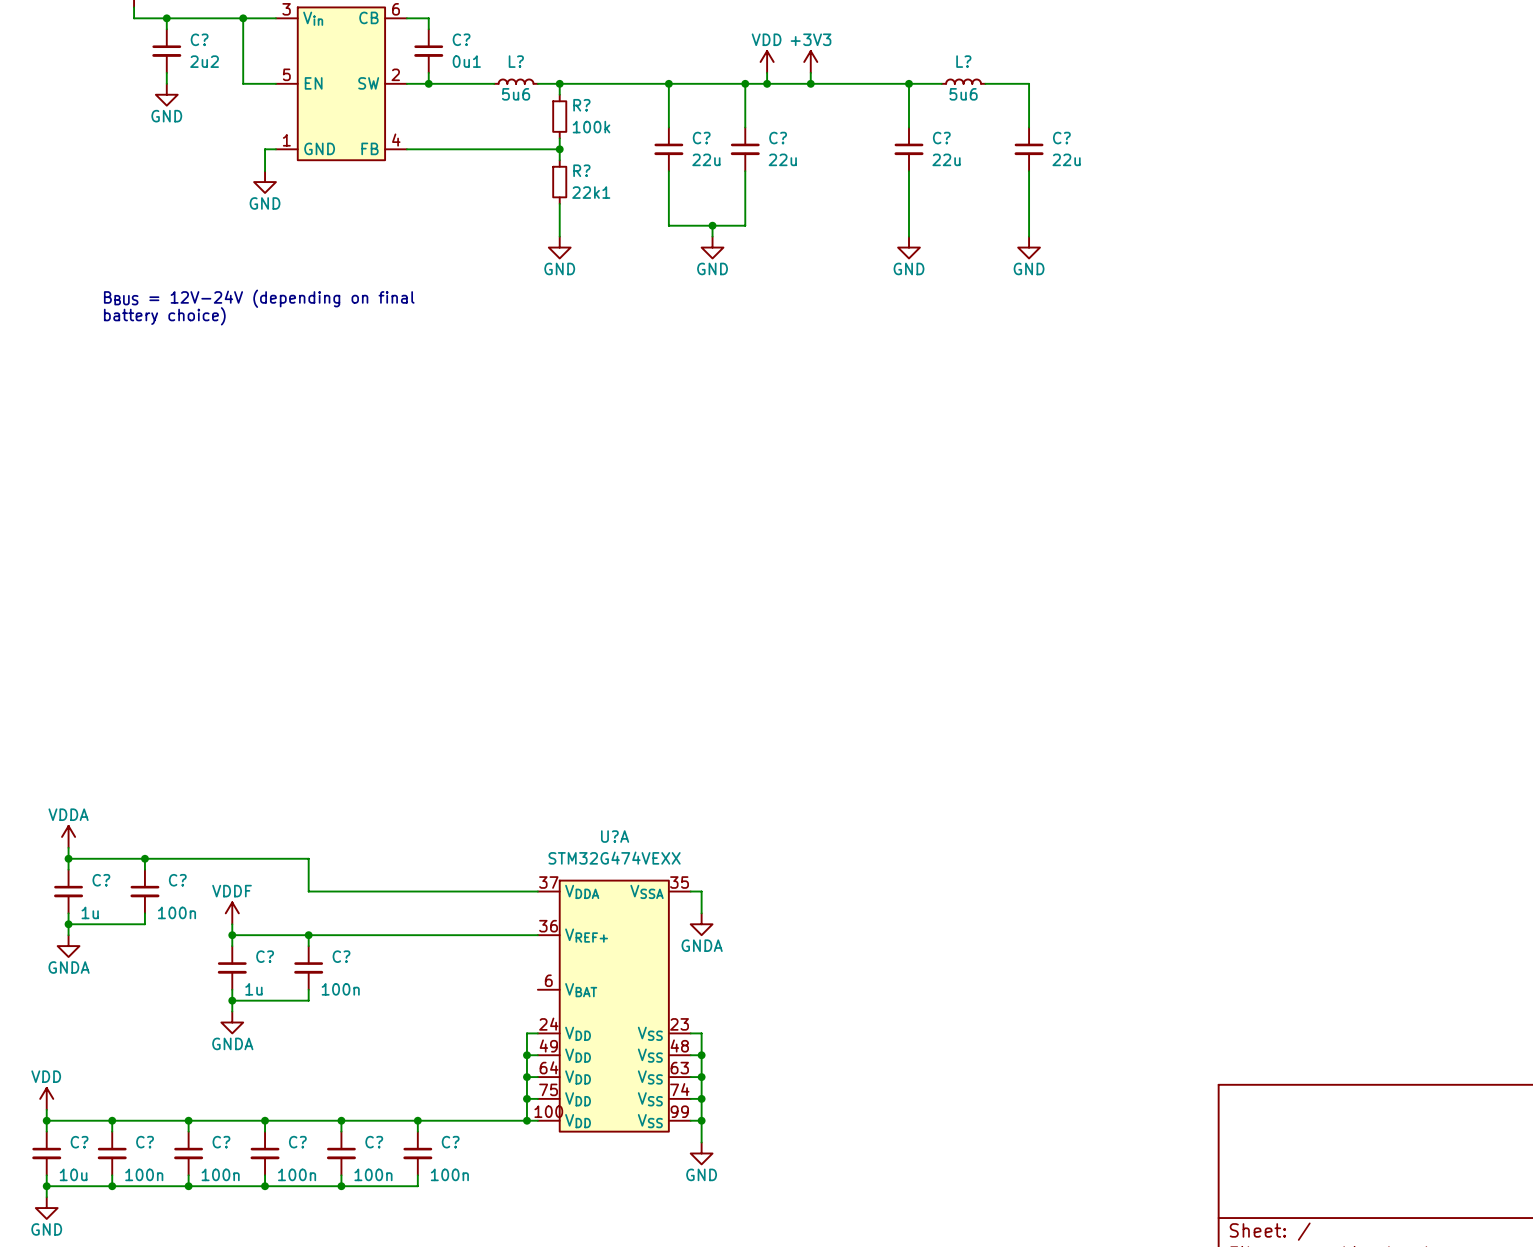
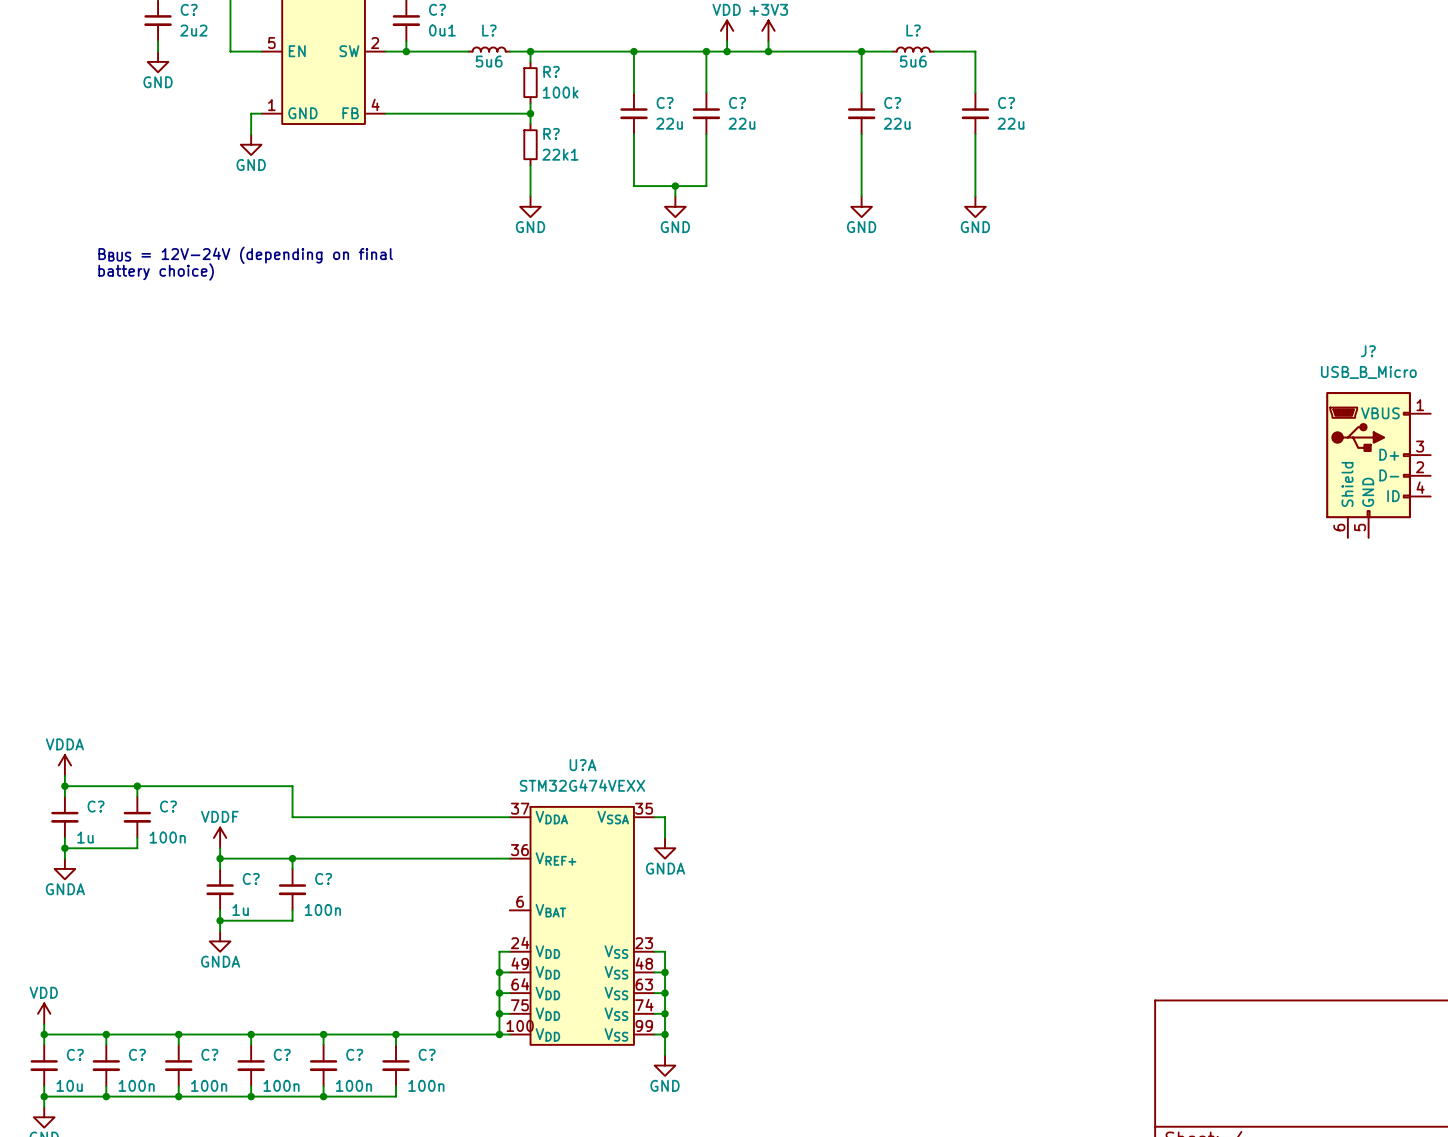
J?: none -> USB_B_Micro (1378, 464)

